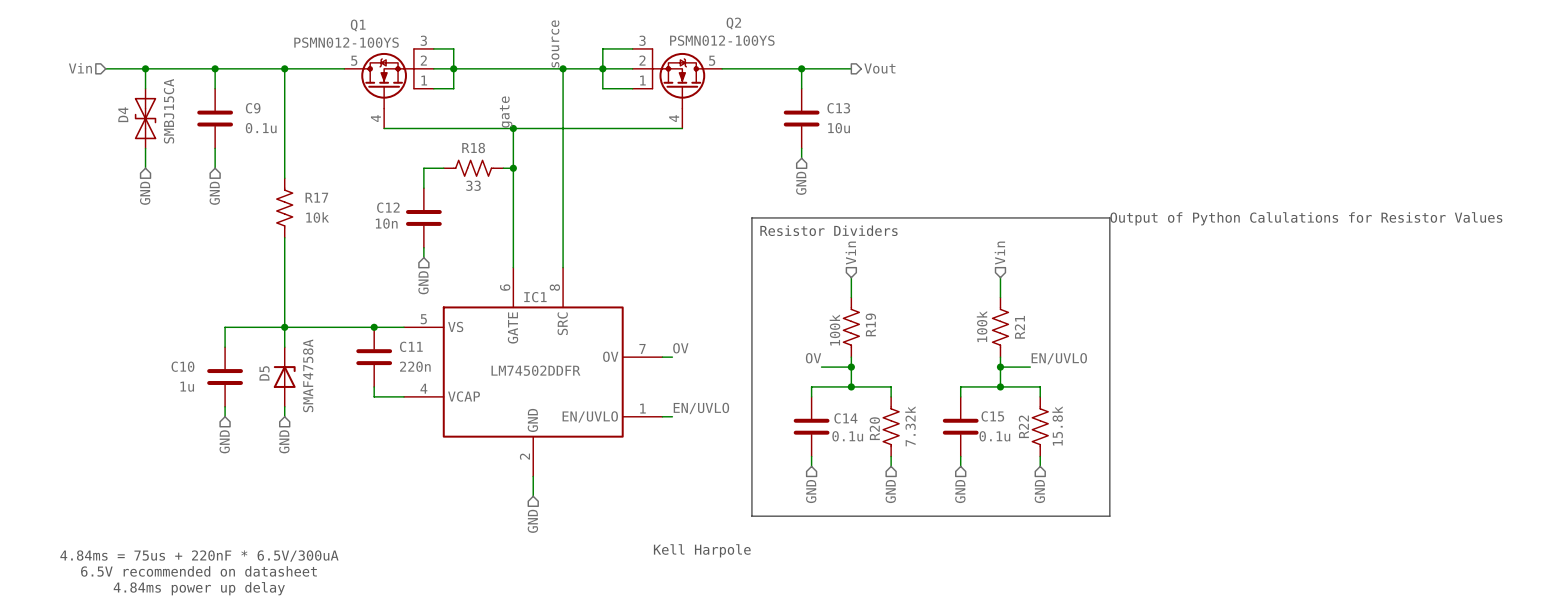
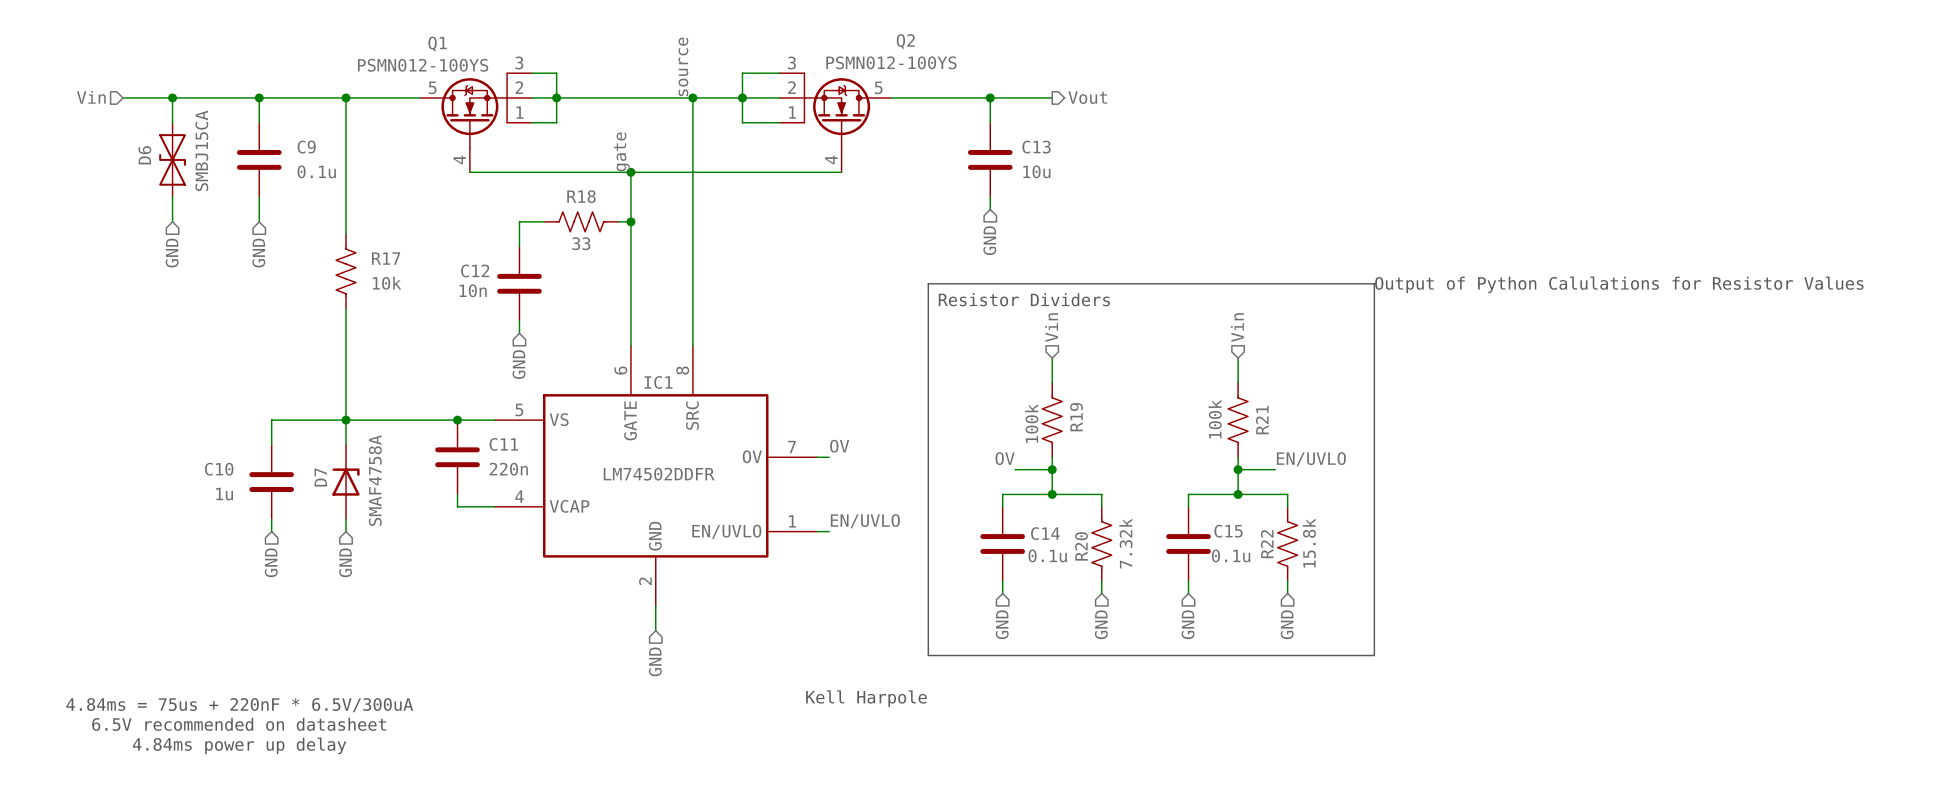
D4 name: D4 (123, 114) -> D6 (144, 155)
D5 name: D5 (264, 373) -> D7 (320, 477)

